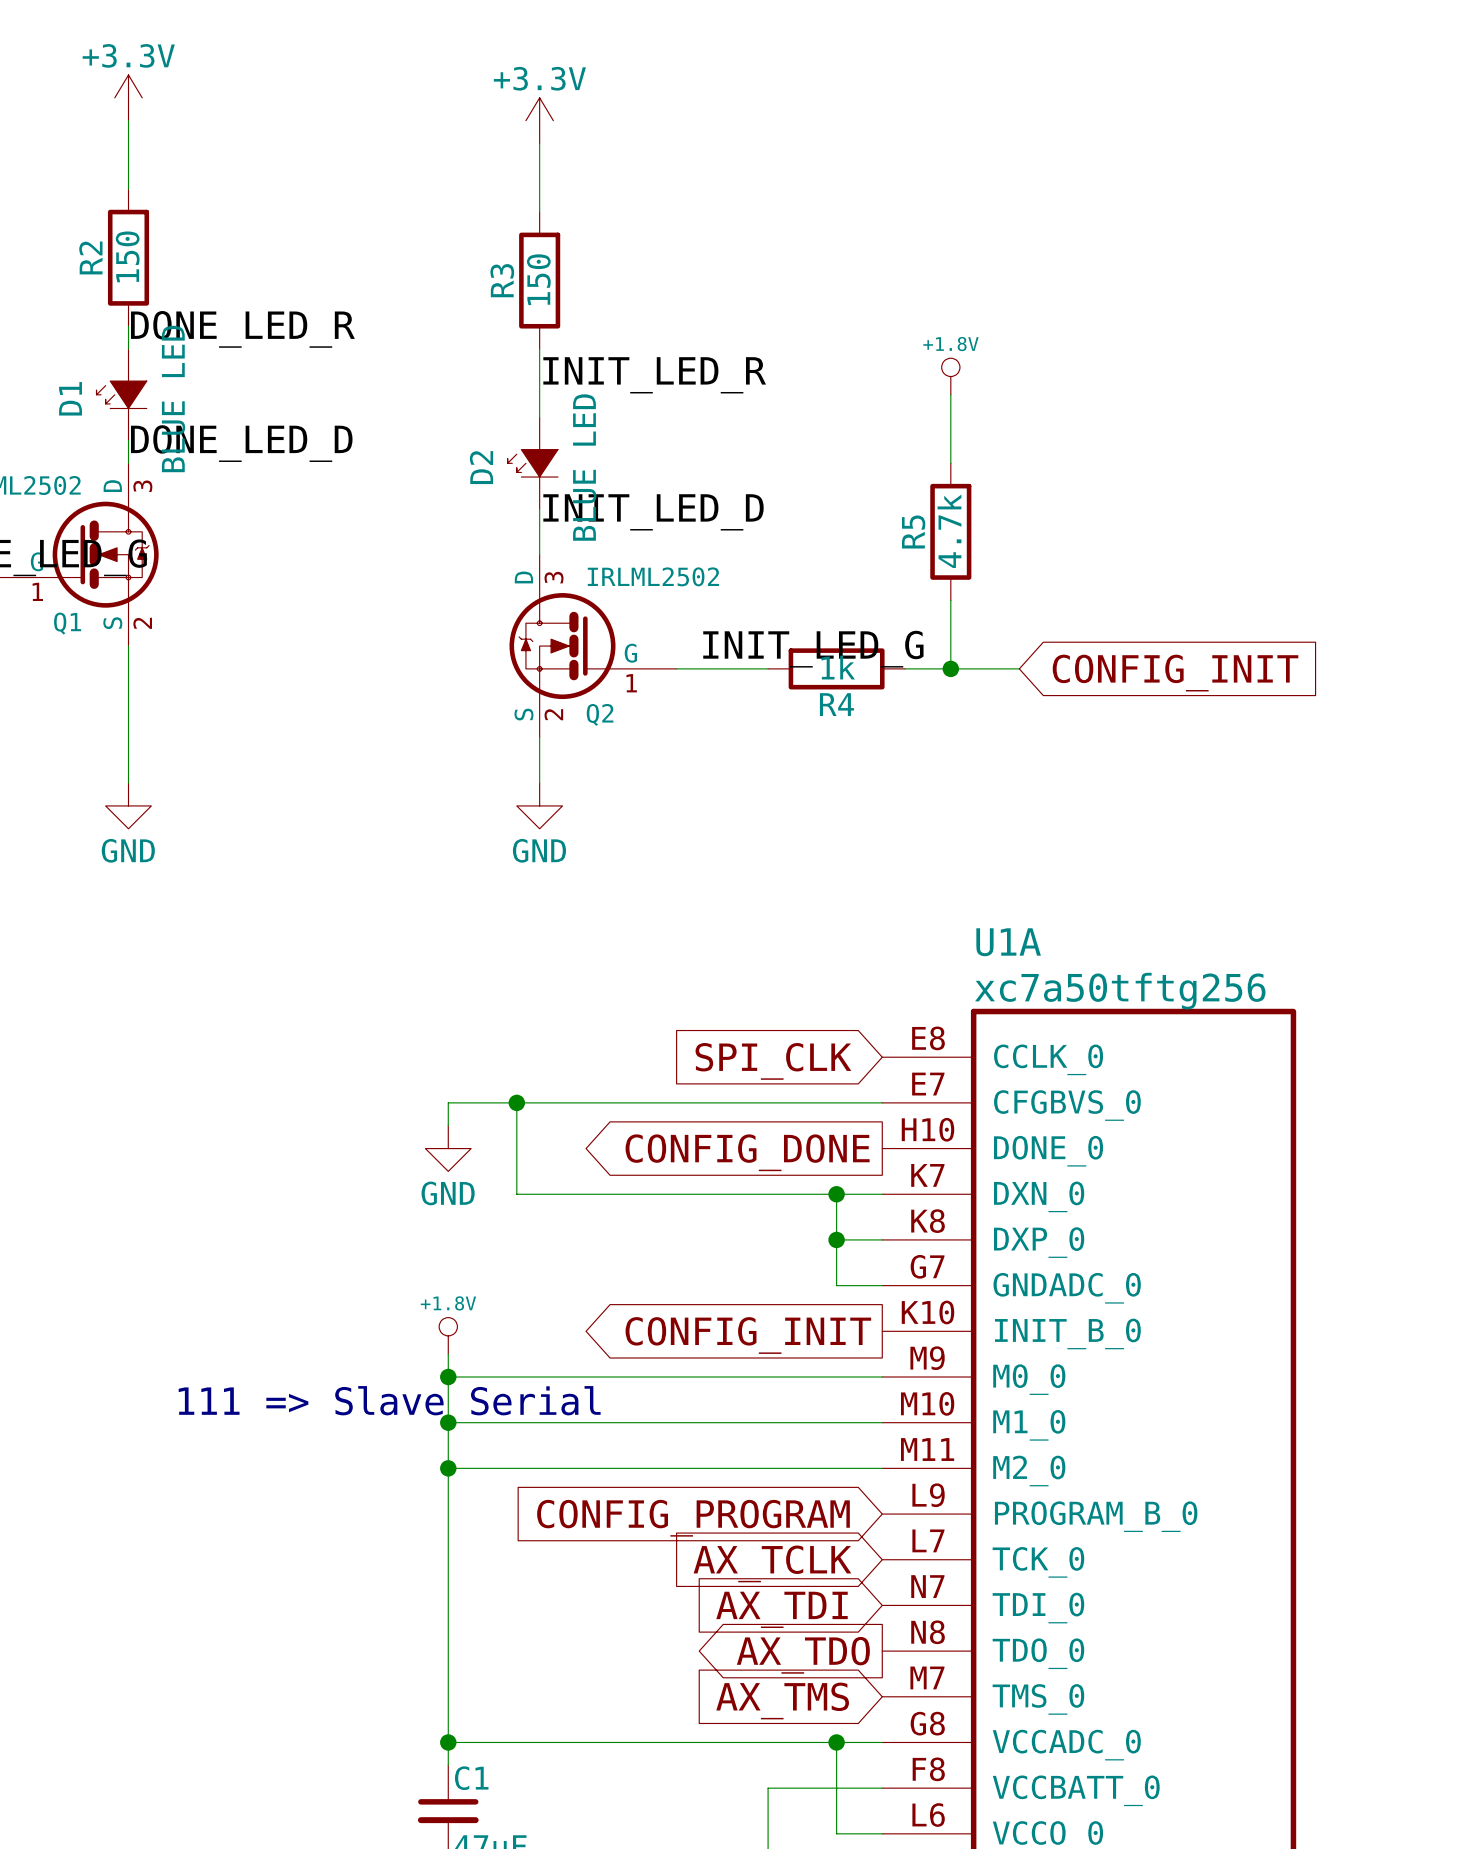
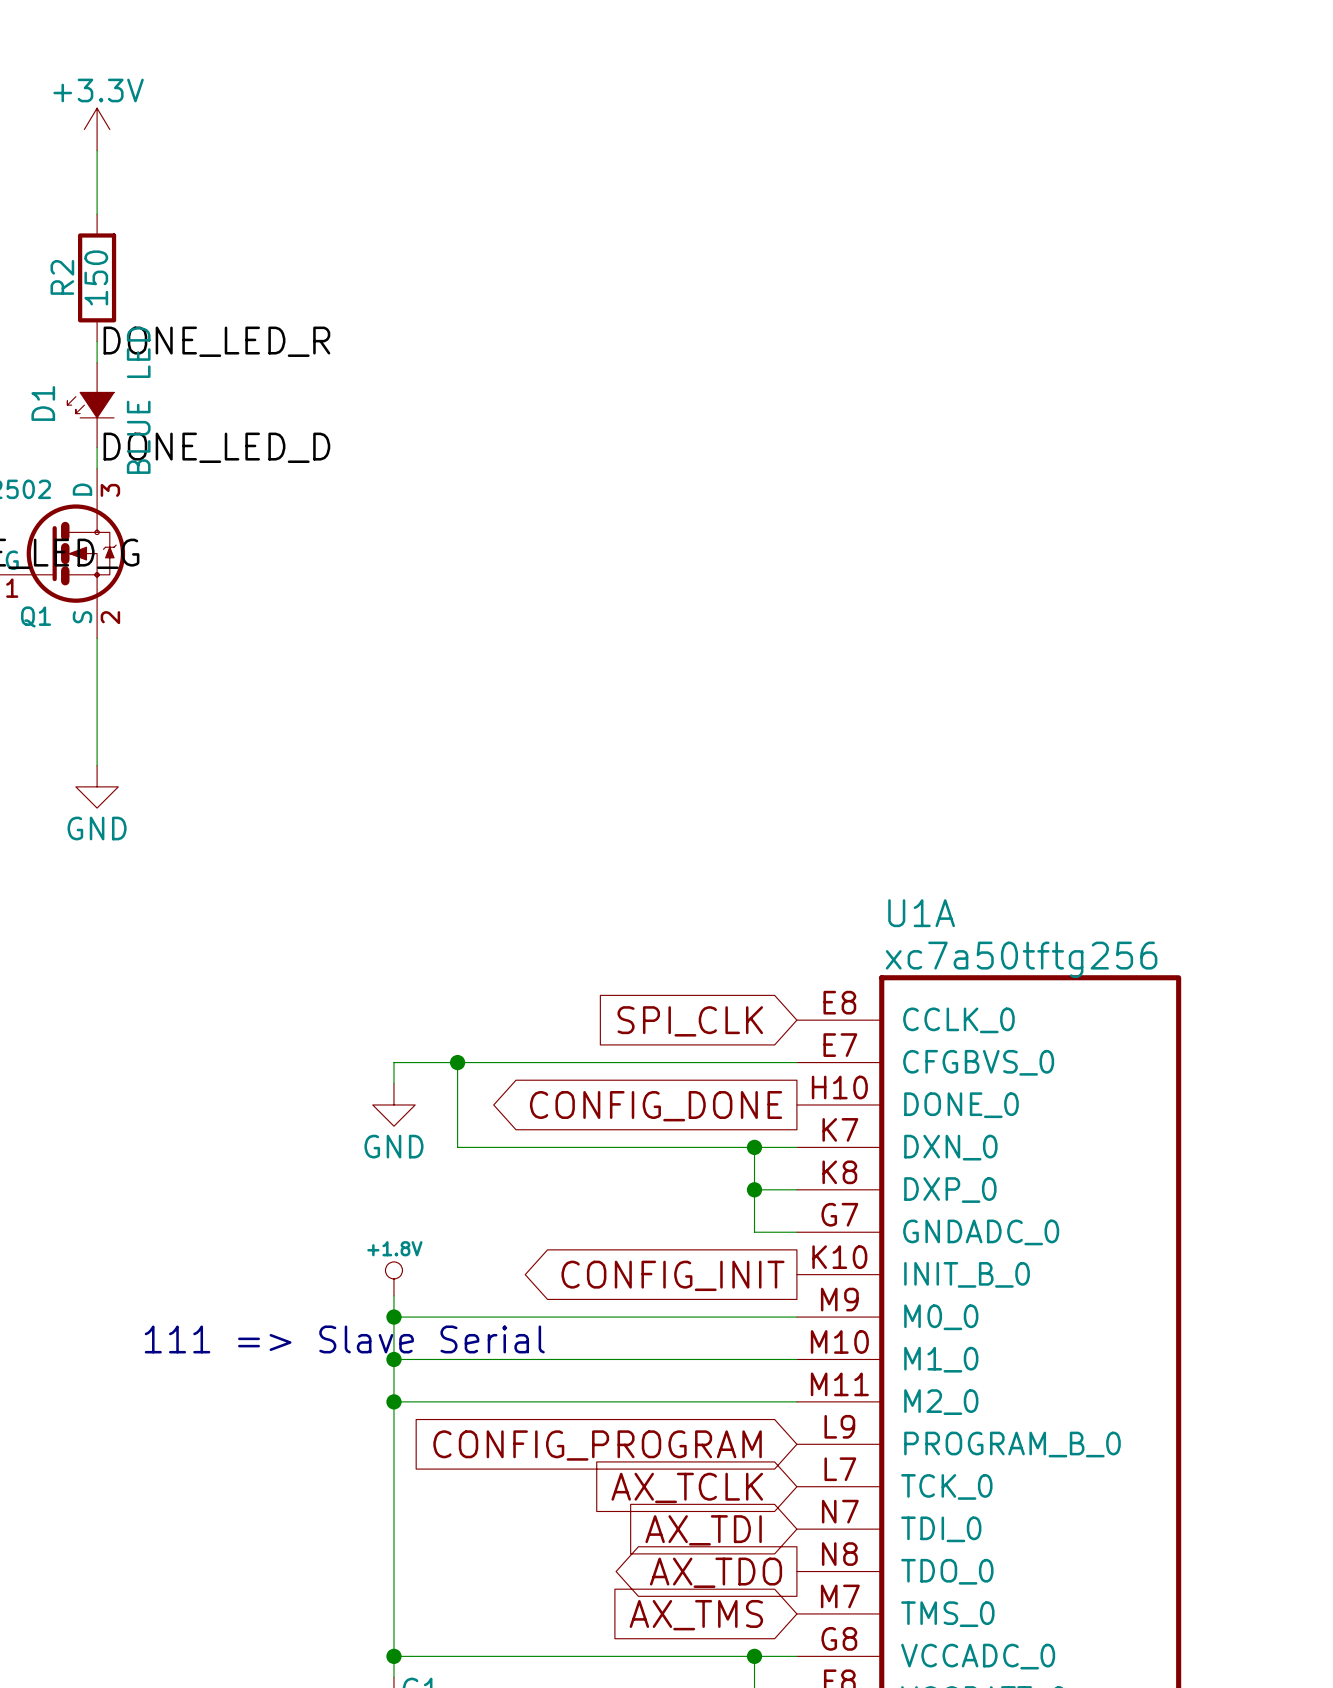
power symbol: +3.3V (539, 120) -> none
wire: (539, 143) (539, 212) -> none
R3: 150 (539, 280) -> none
wire: (539, 349) (539, 417) -> none
label: INIT_LED_R (654, 375) -> none
power symbol: +1.8V (950, 376) -> none
wire: (950, 394) (950, 463) -> none
D2: BLUE LED (532, 463) -> none
wire: (539, 509) (539, 554) -> none
label: INIT_LED_D (653, 512) -> none
R5: 4.7k (950, 531) -> none
wire: (950, 600) (950, 668) -> none
Q2: IRLML2502 (593, 646) -> none
label: INIT_LED_G (813, 649) -> none
wire: (676, 668) (768, 668) -> none
R4: 1k (836, 668) -> none
wire: (905, 668) (1019, 668) -> none
junction: (950, 668) -> none
global label: CONFIG_INIT (1175, 673) -> none
wire: (539, 737) (539, 783) -> none
power symbol: GND (539, 805) -> none

